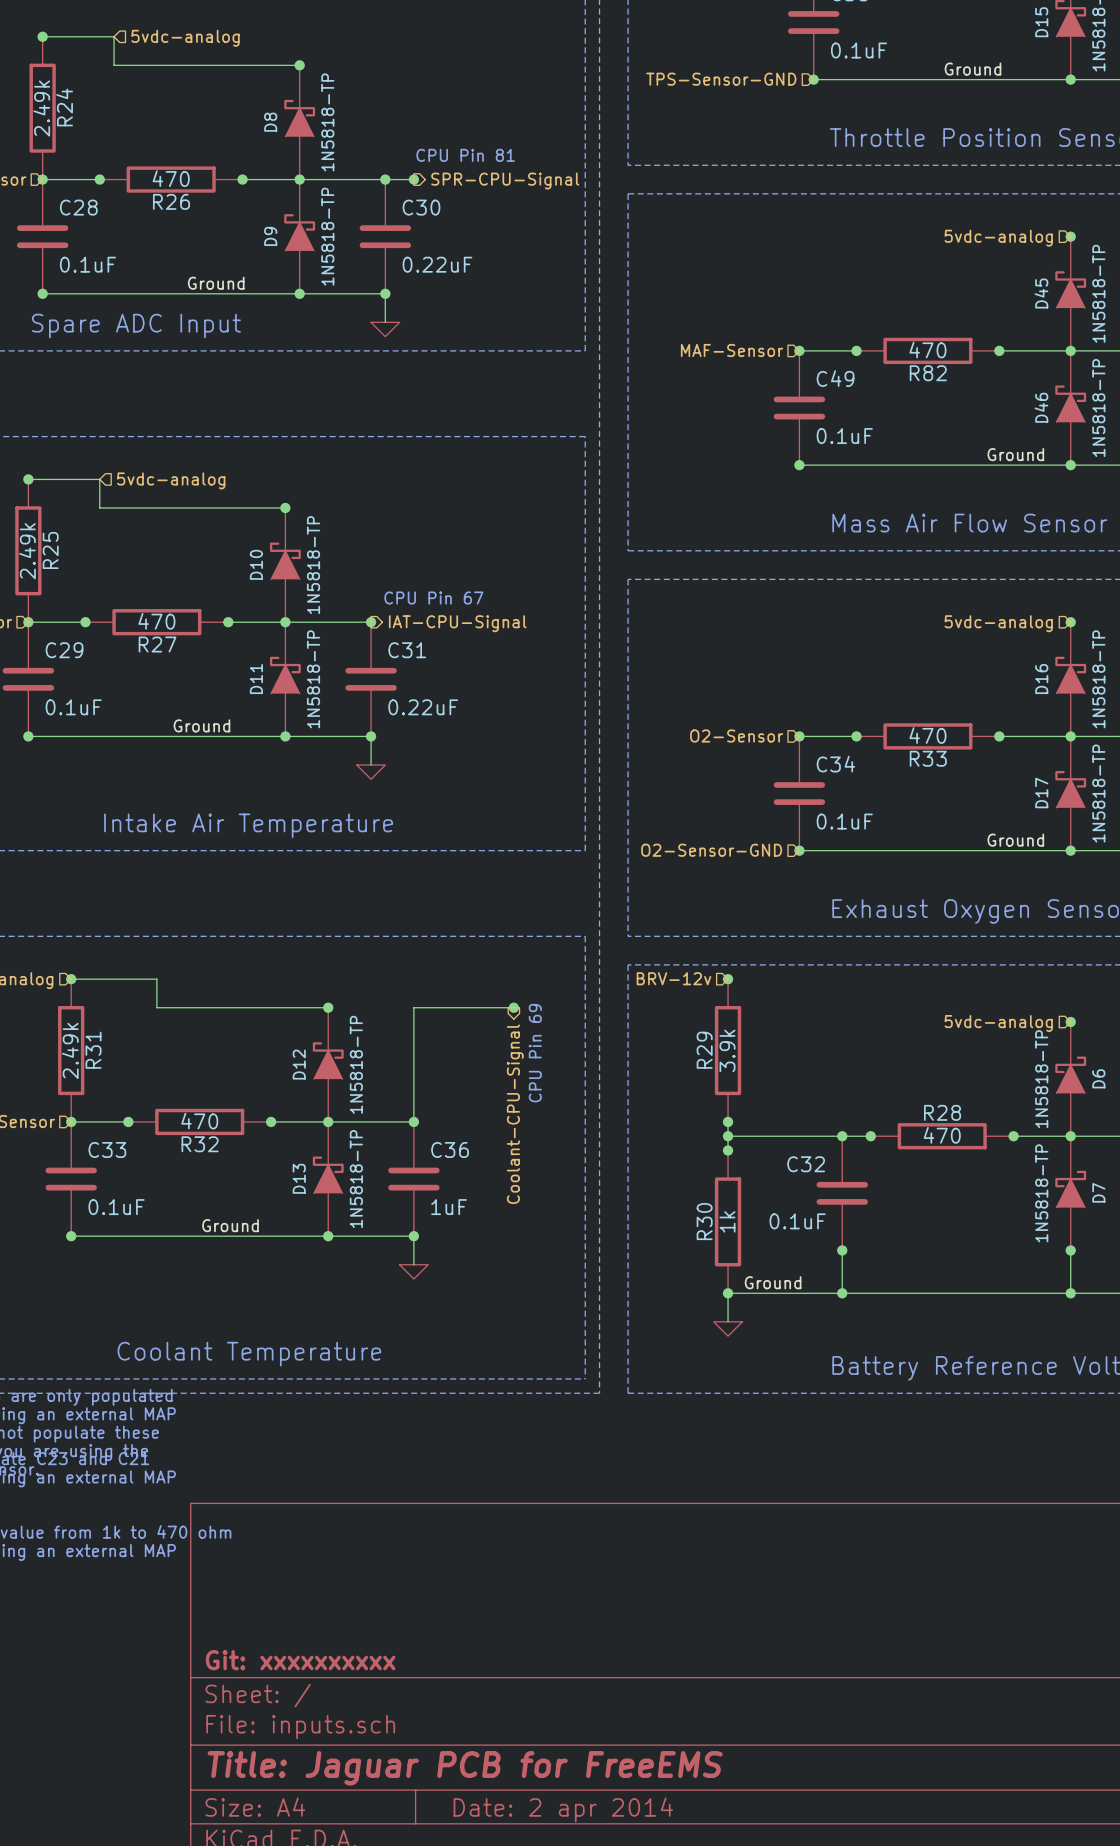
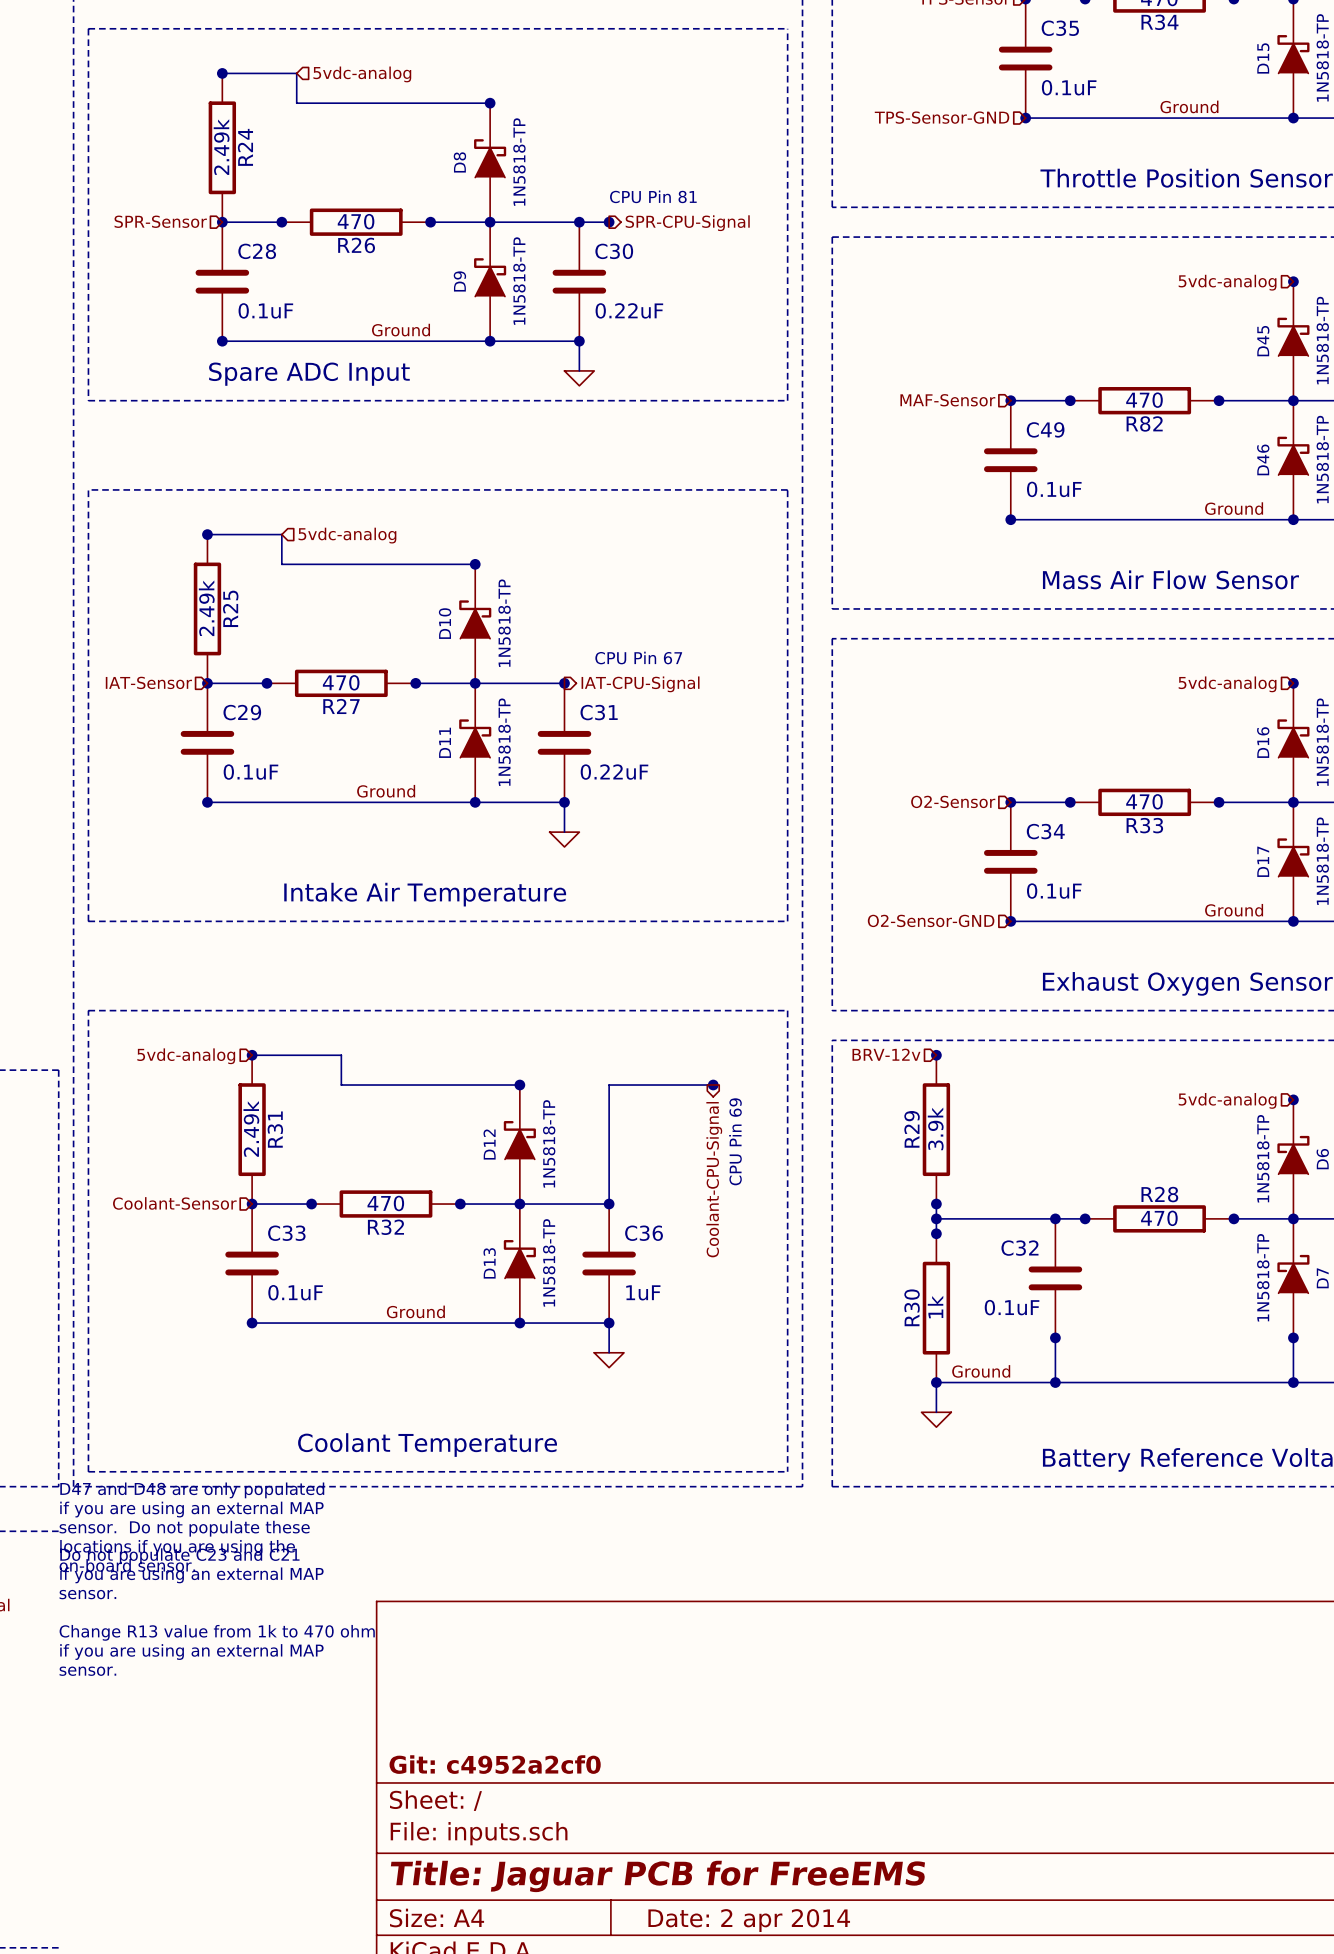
title block: Git: xxxxxxxxxx (300, 1660) -> Git: c4952a2cf0 (495, 1764)

